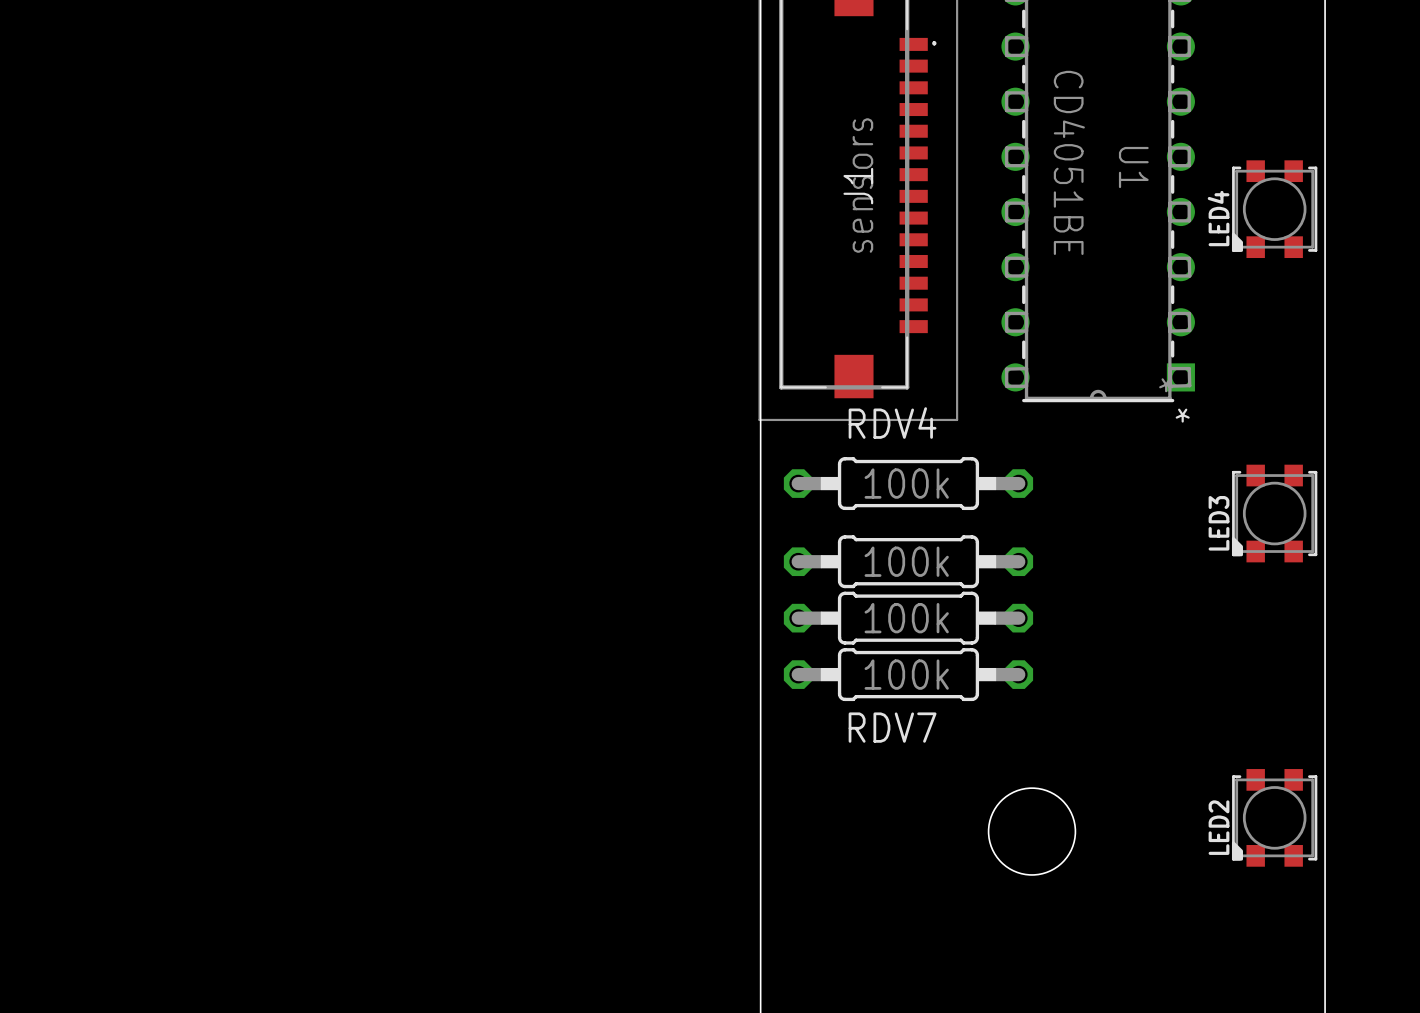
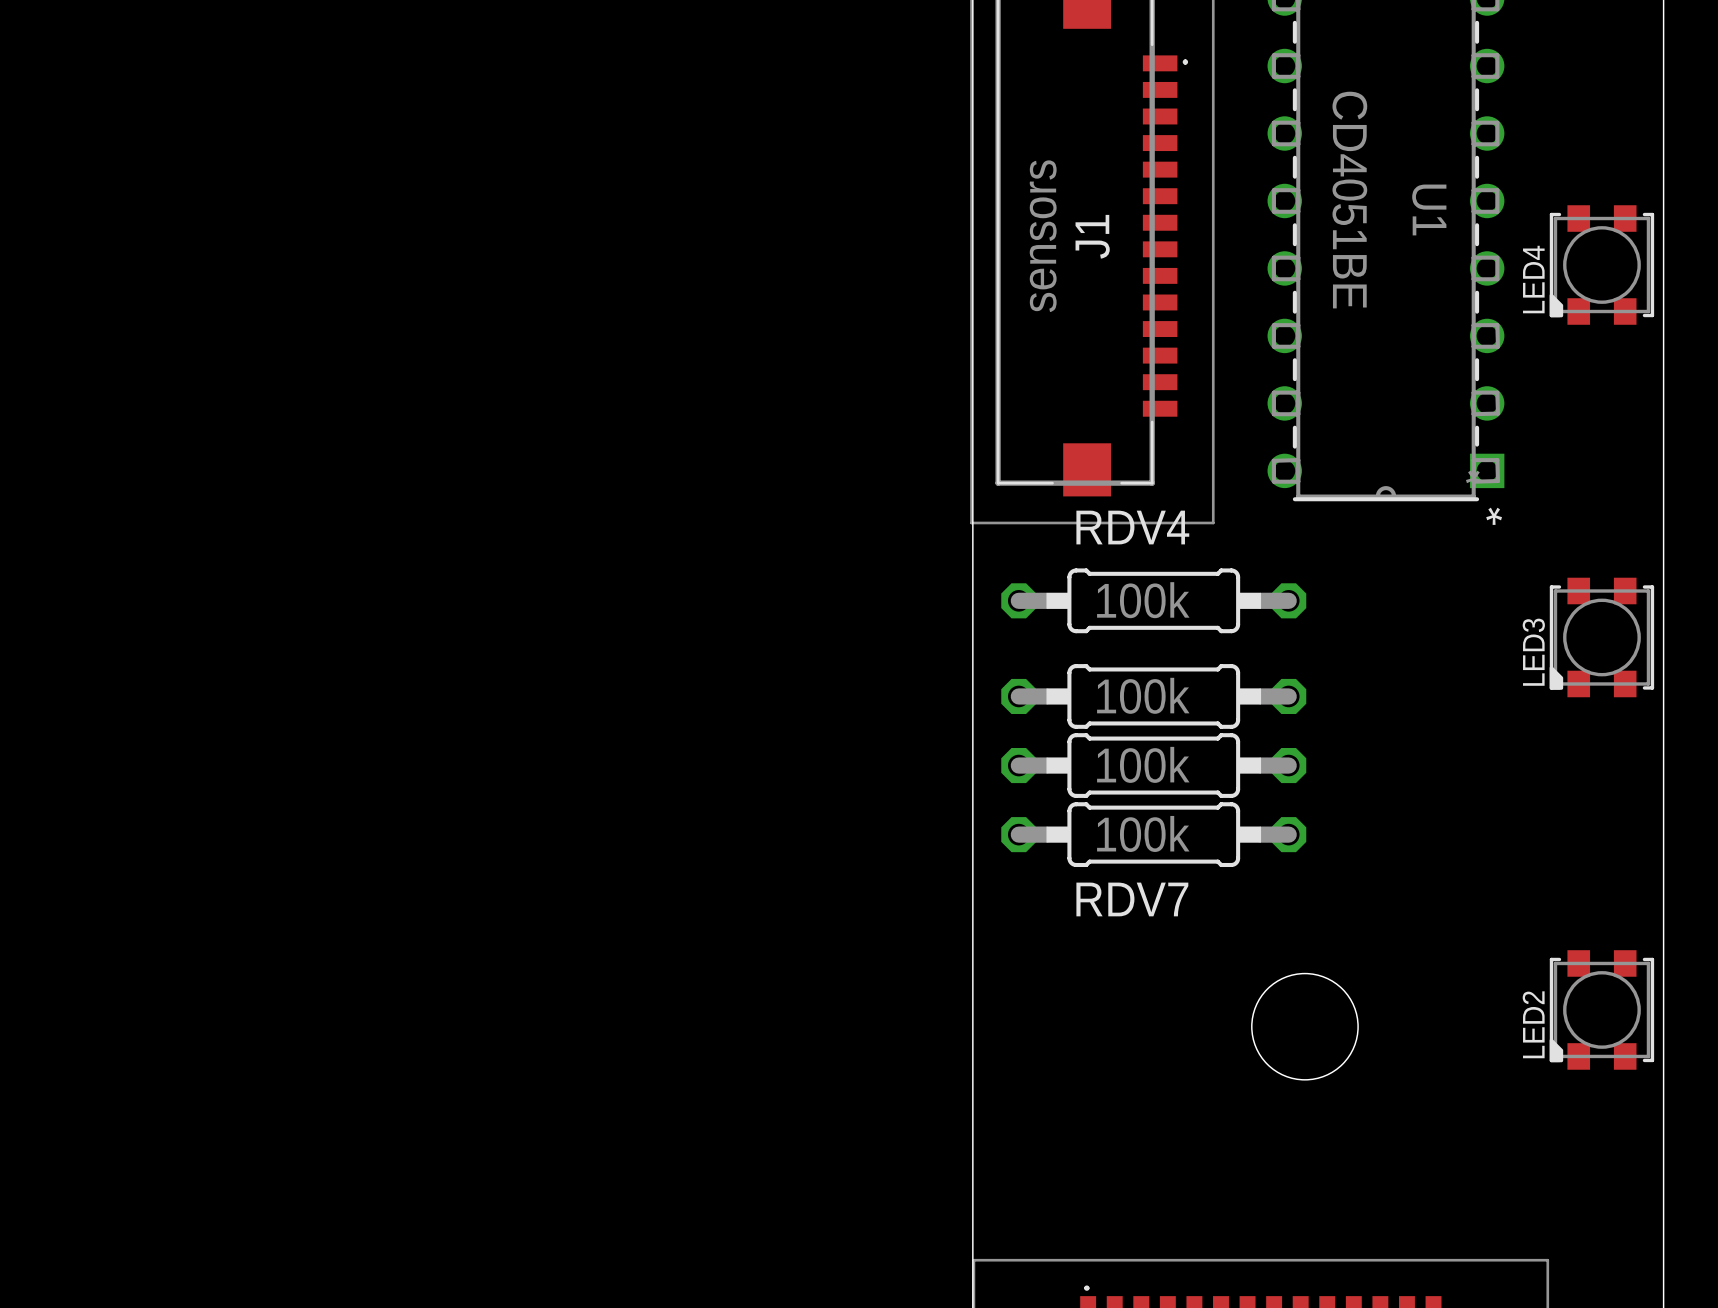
J1 value position: sensors (862, 185) -> sensors (1043, 236)

